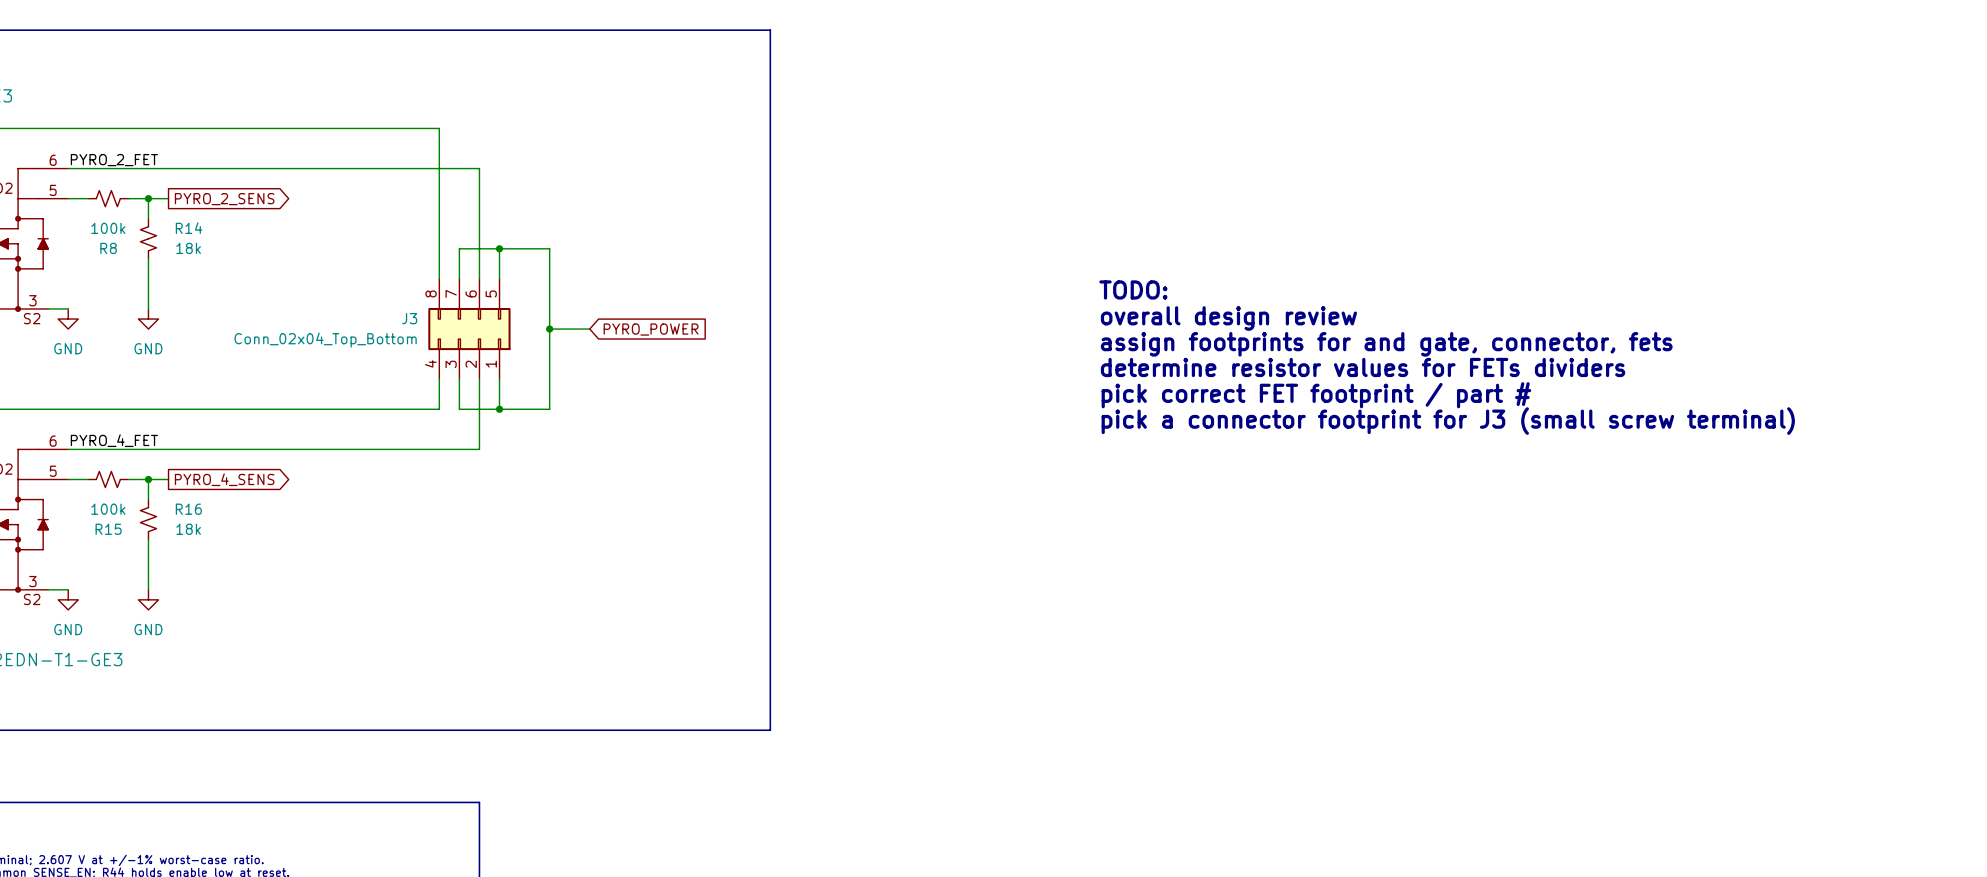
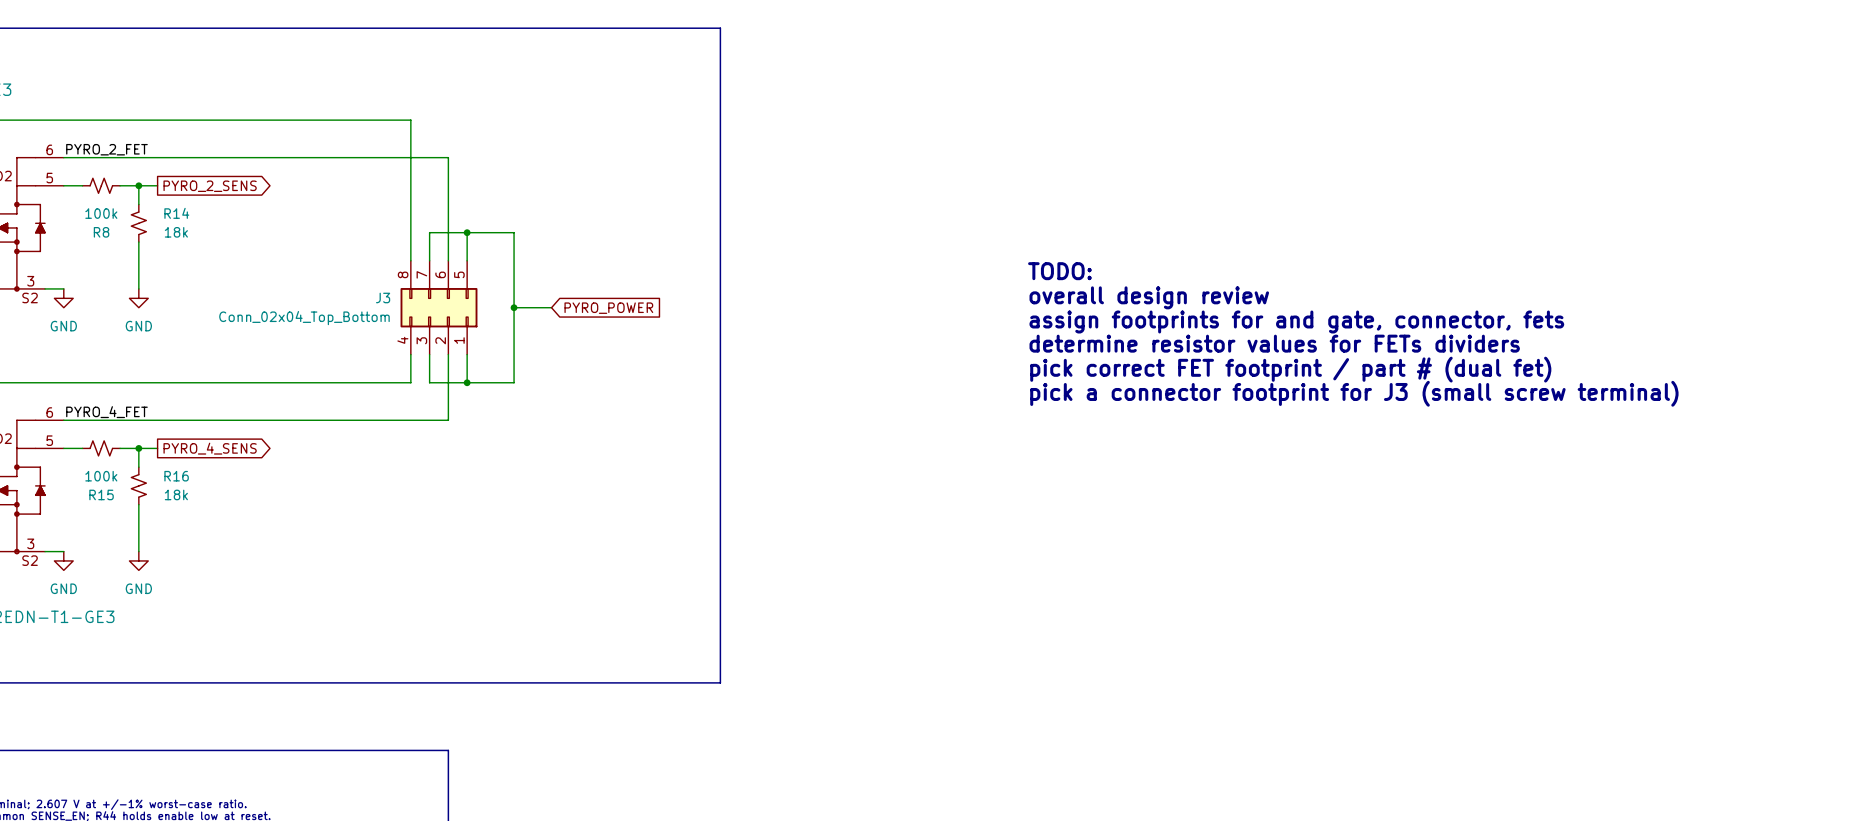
text: pick correct FET footprint / part # (1316, 395) -> pick correct FET footprint / part # (dual fet) (1290, 369)

